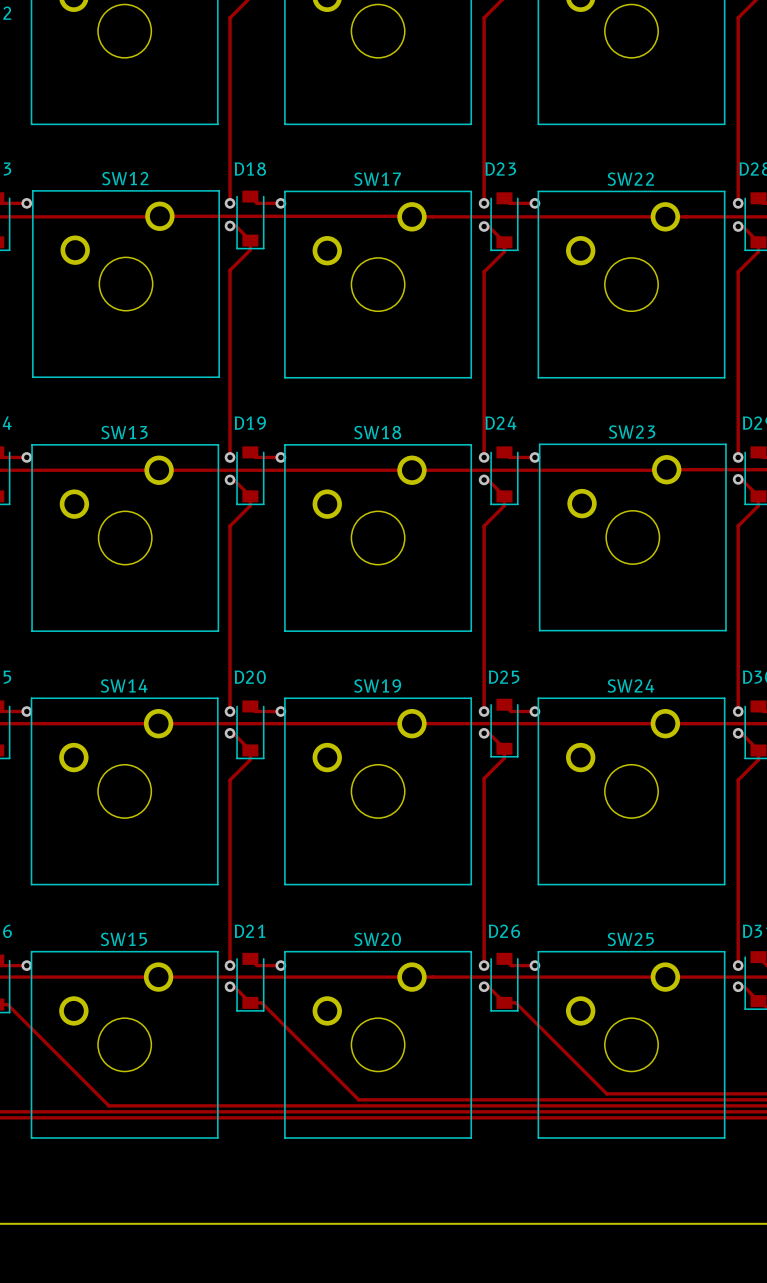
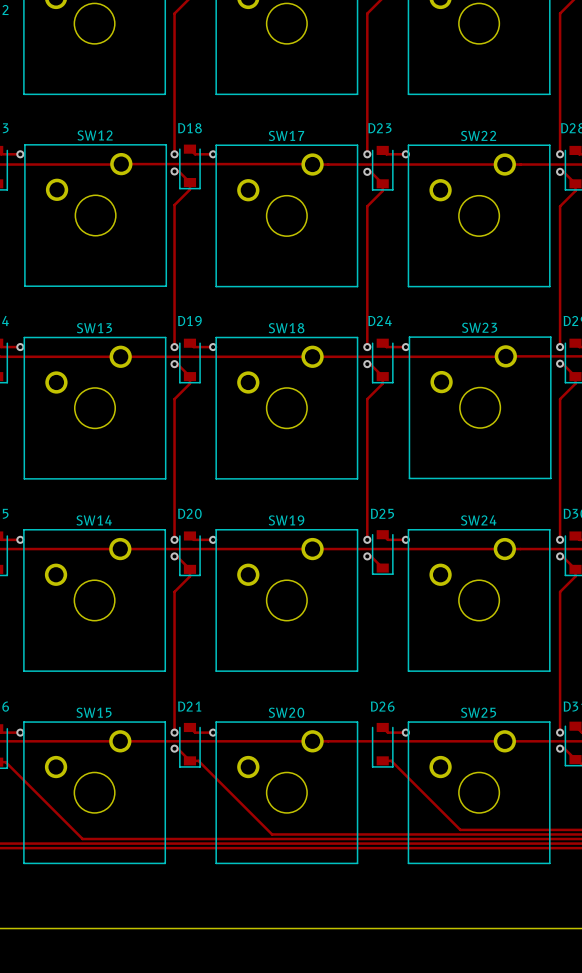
track: (504, 748) (504, 758) (484, 778) (484, 965) -> none
via: (484, 965) -> none
track: (484, 986) (488, 986) (504, 1002) -> none
via: (484, 986) -> none

